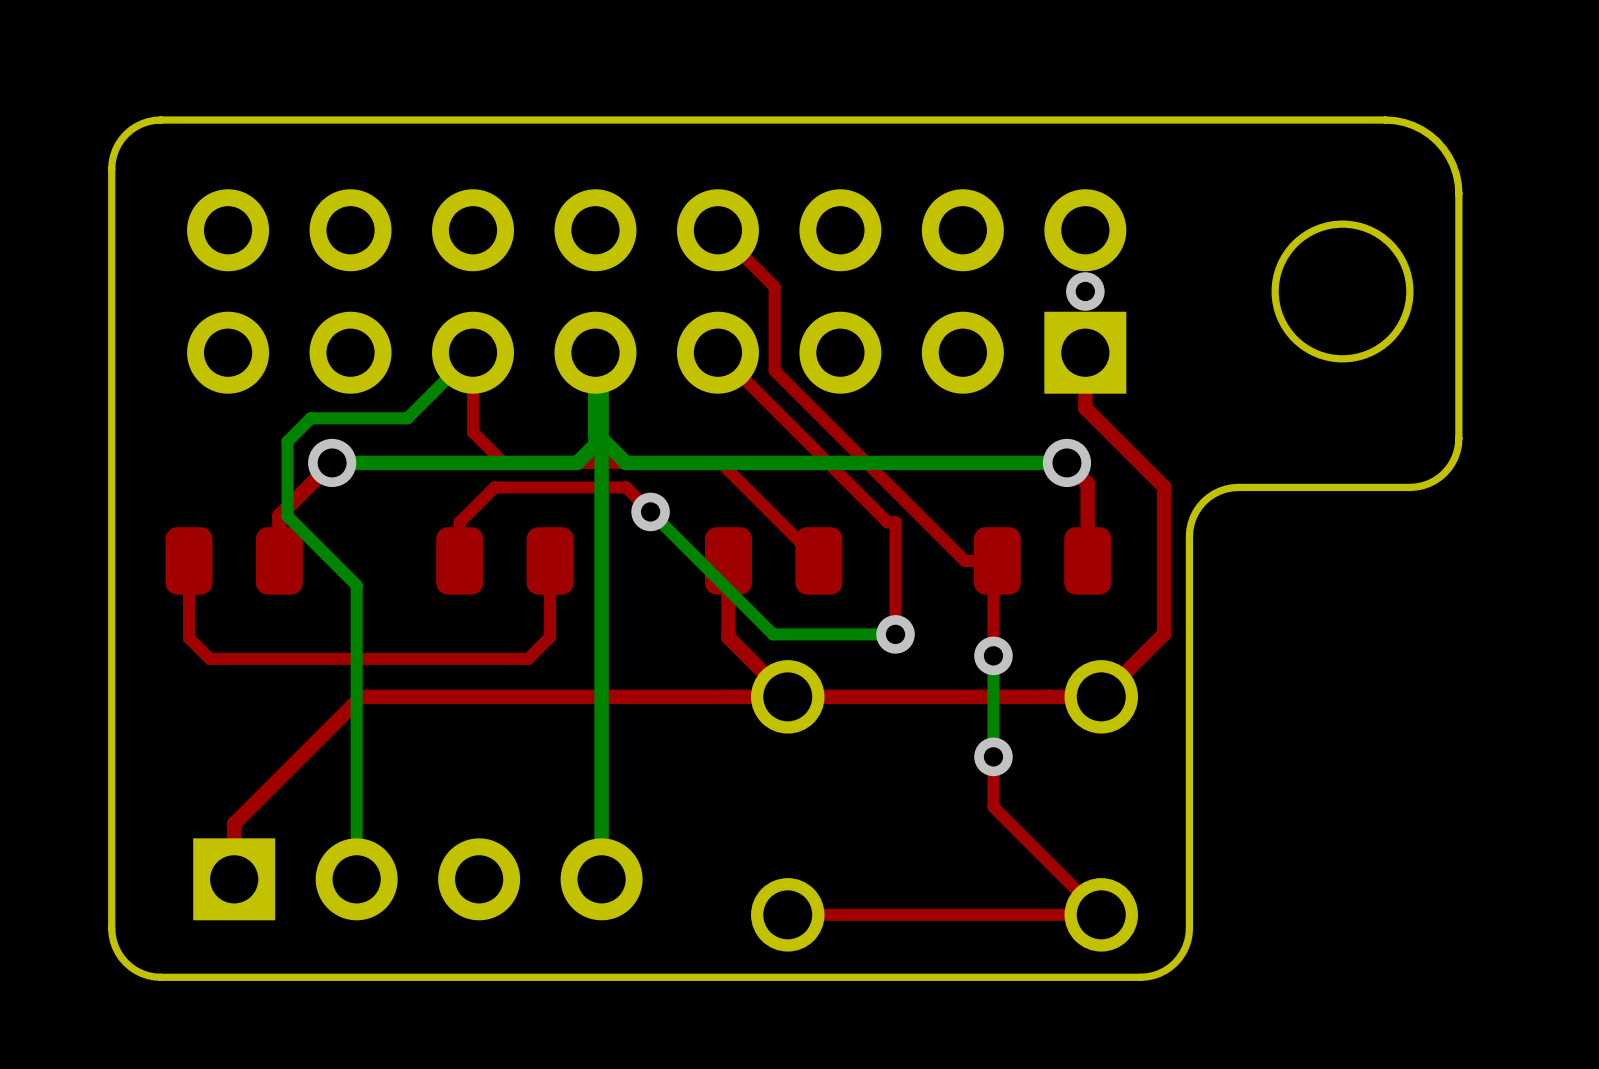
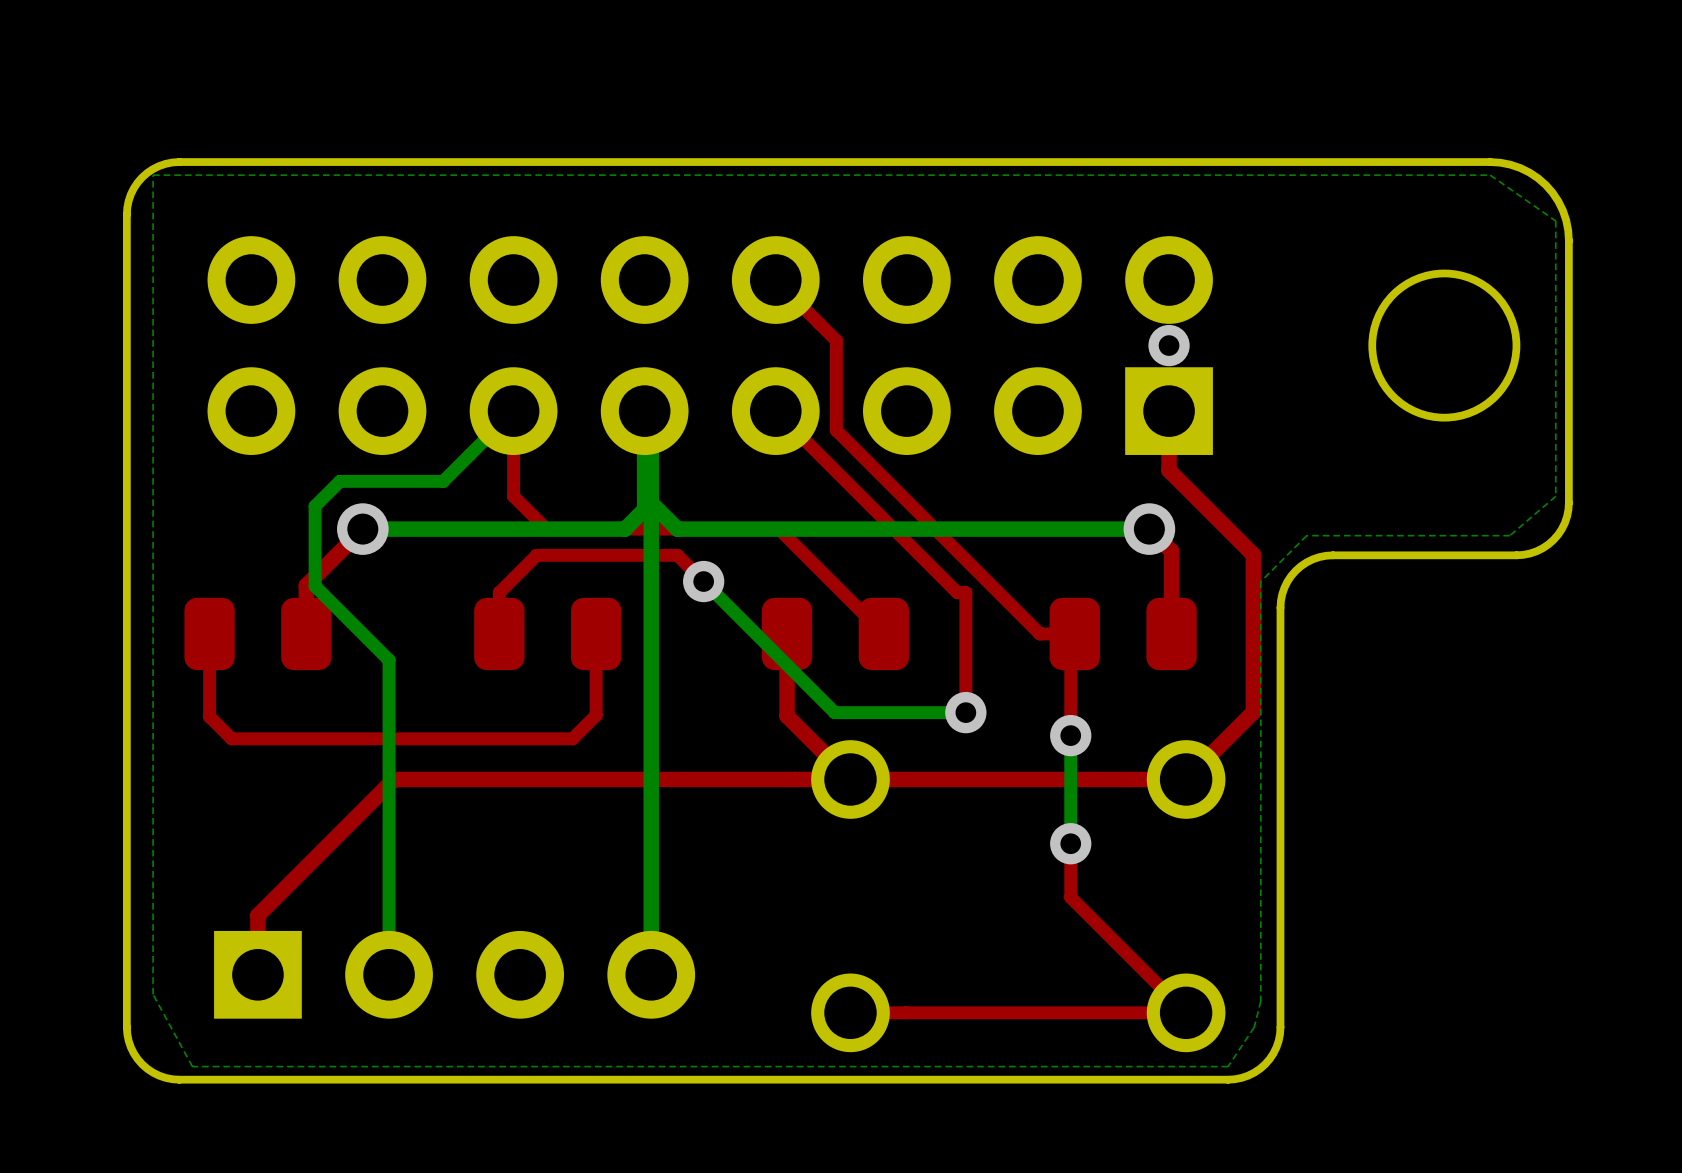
bottom zone outline: none -> (1490, 175) (153, 175) (153, 994) (192, 1066) (1228, 1066) (1254, 1027) (1260, 1001) (1260, 581) (1306, 535) (1509, 535) (1555, 496) (1555, 221) (1490, 175)

